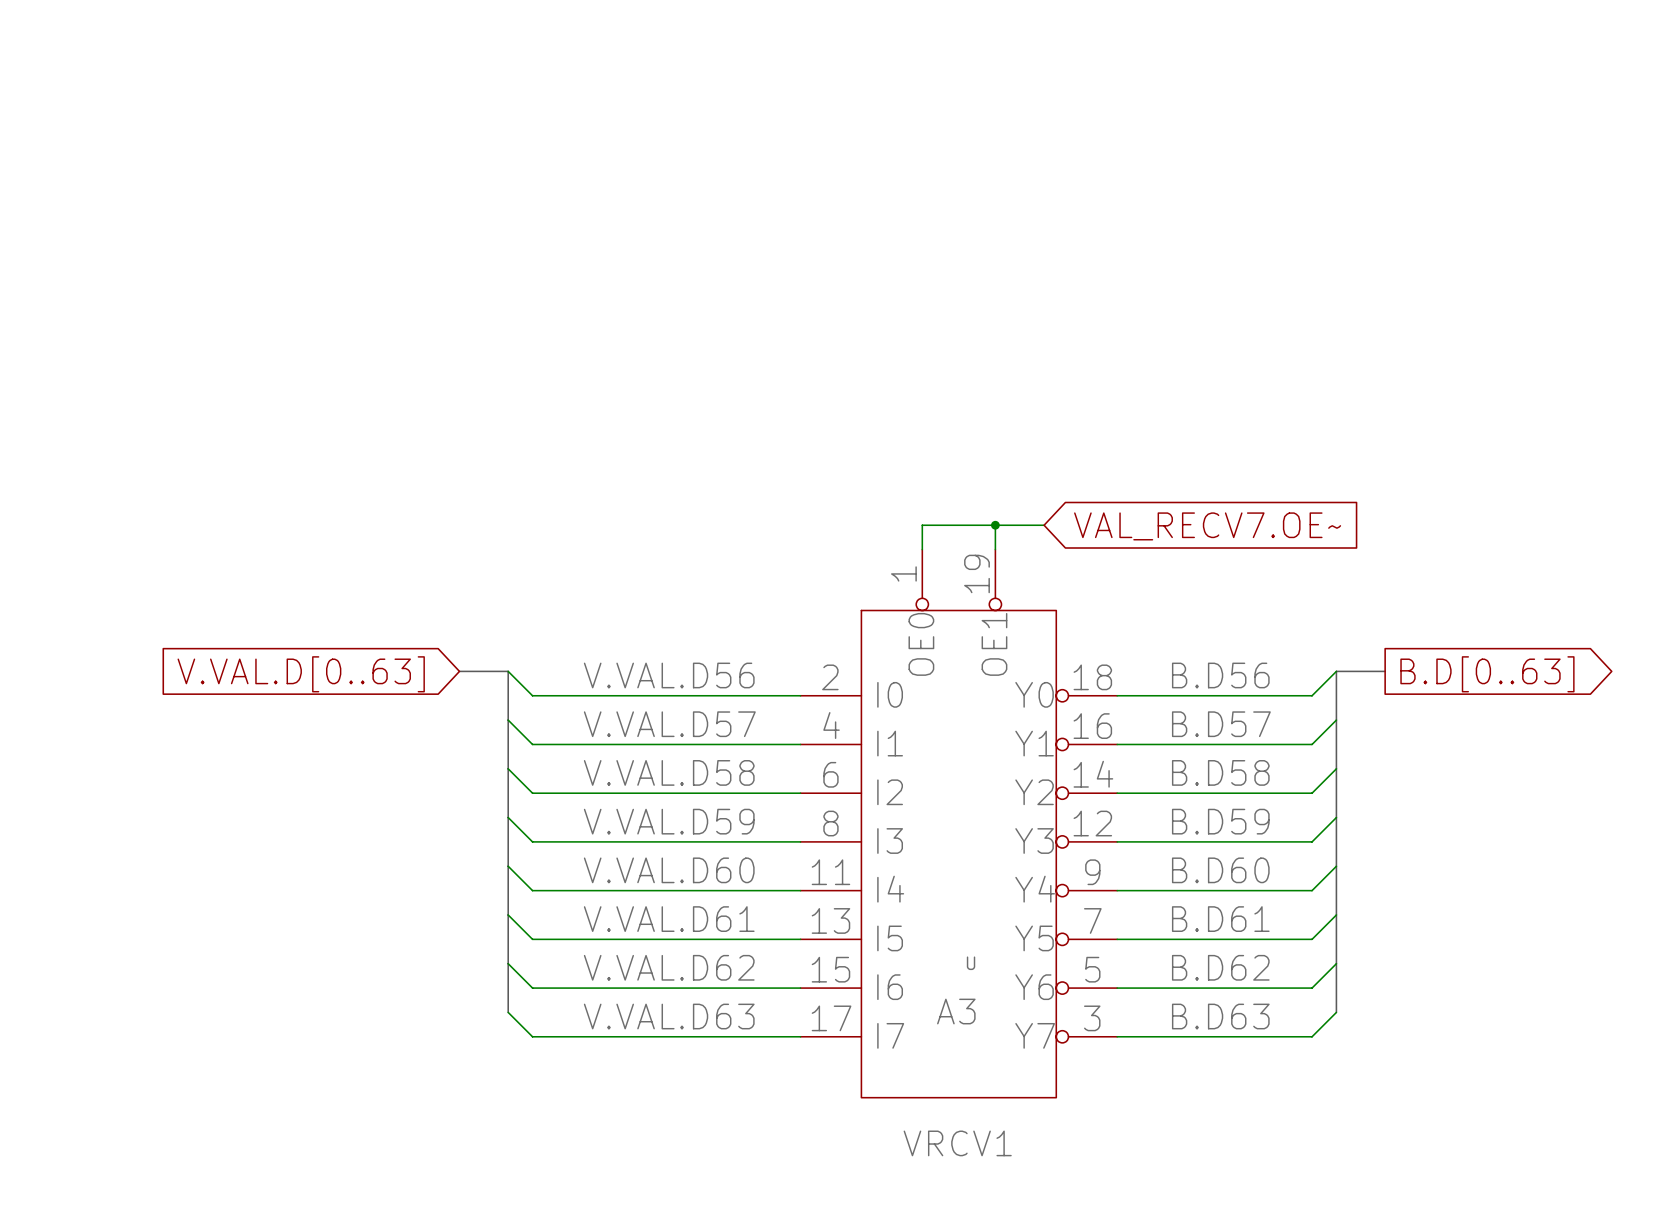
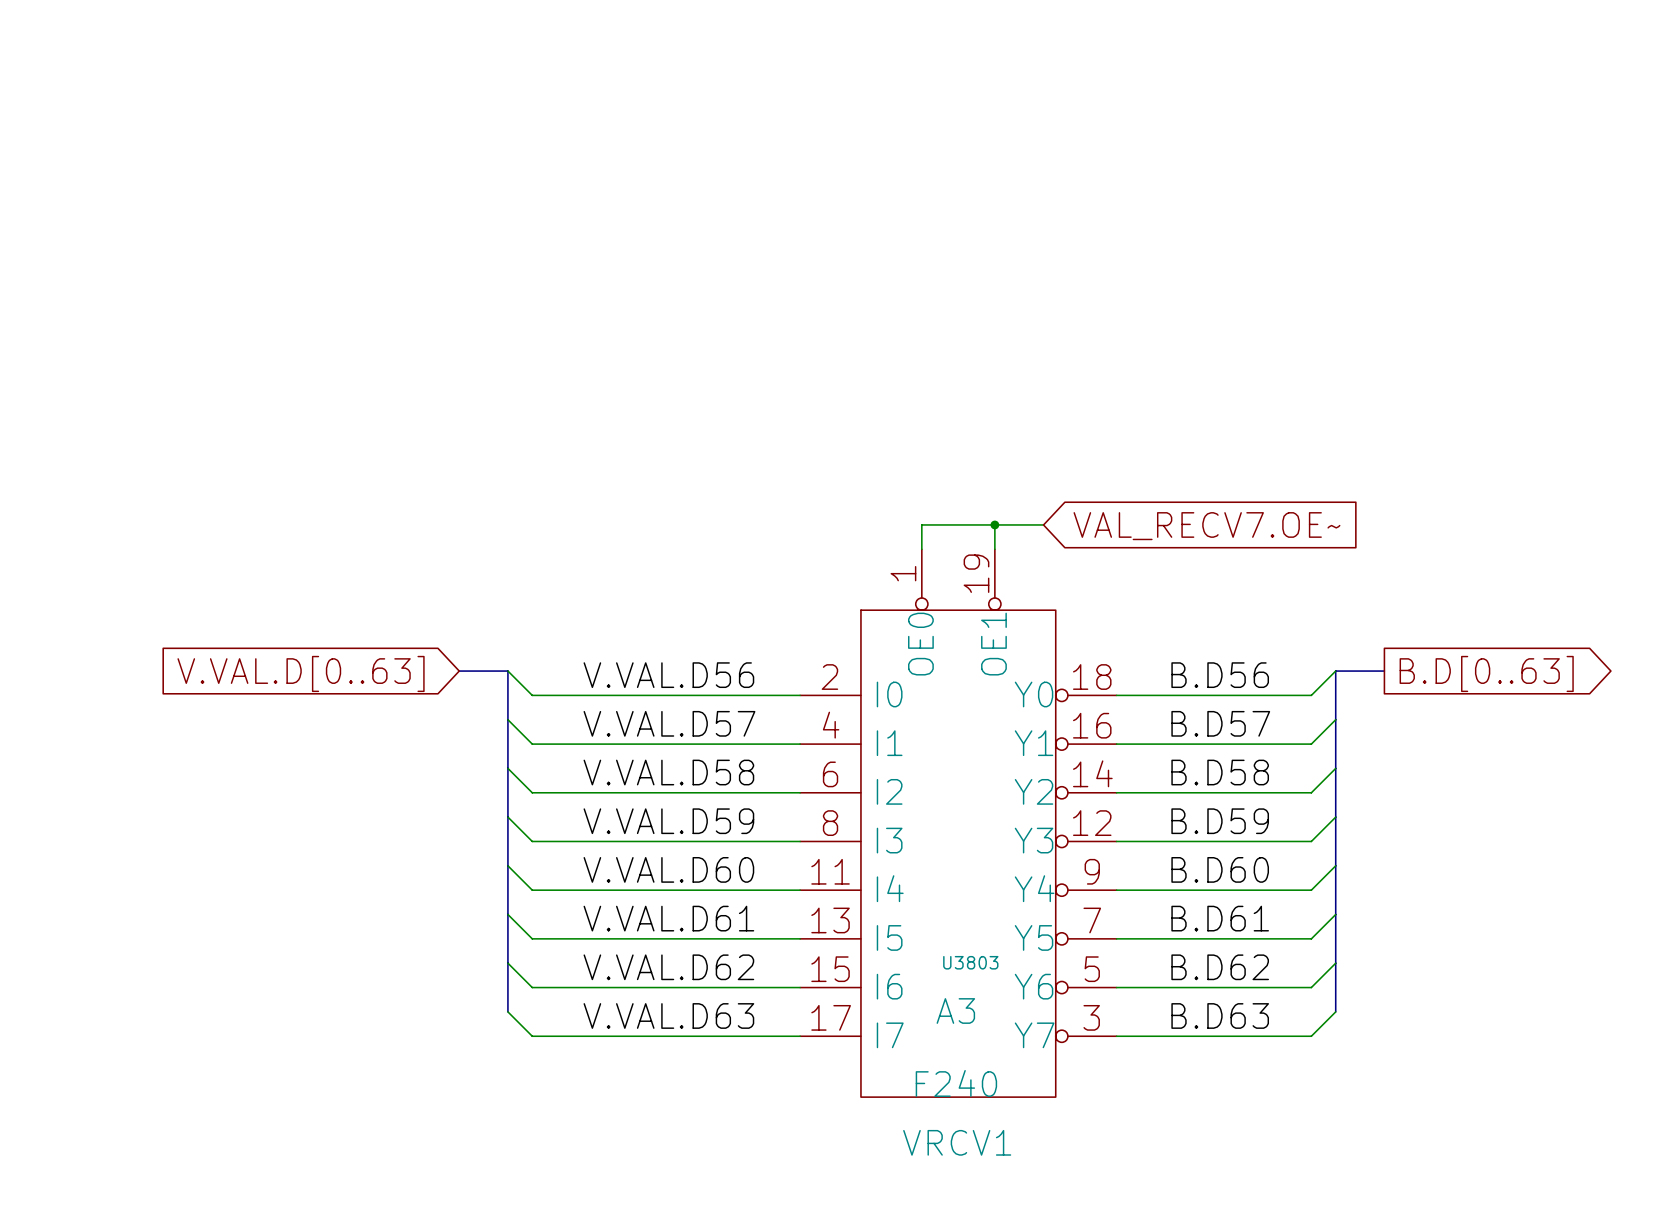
U name: U (971, 963) -> U3803 (970, 962)
U value: none -> F240 (956, 1083)

